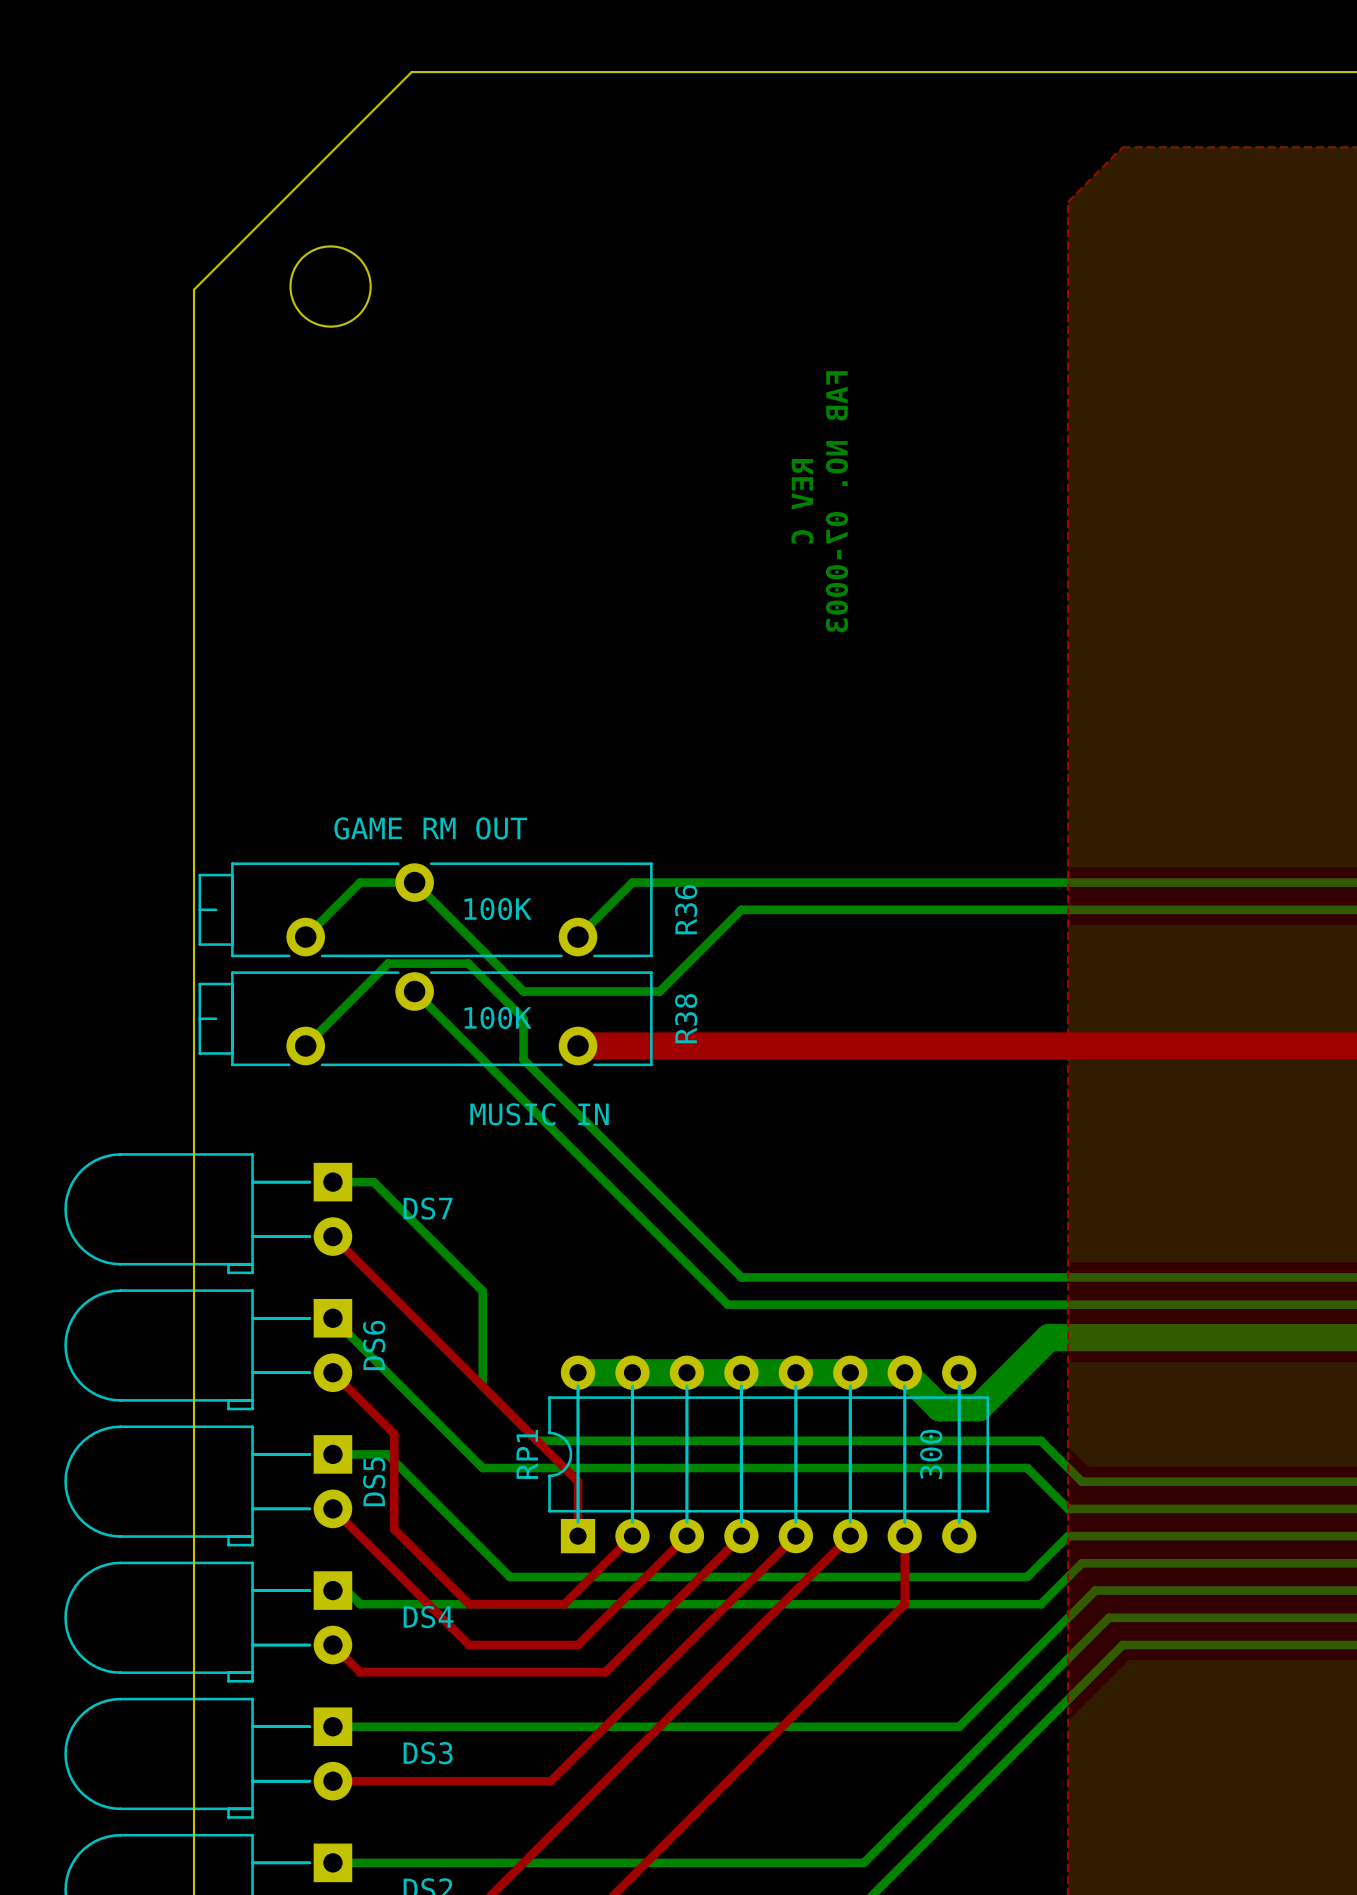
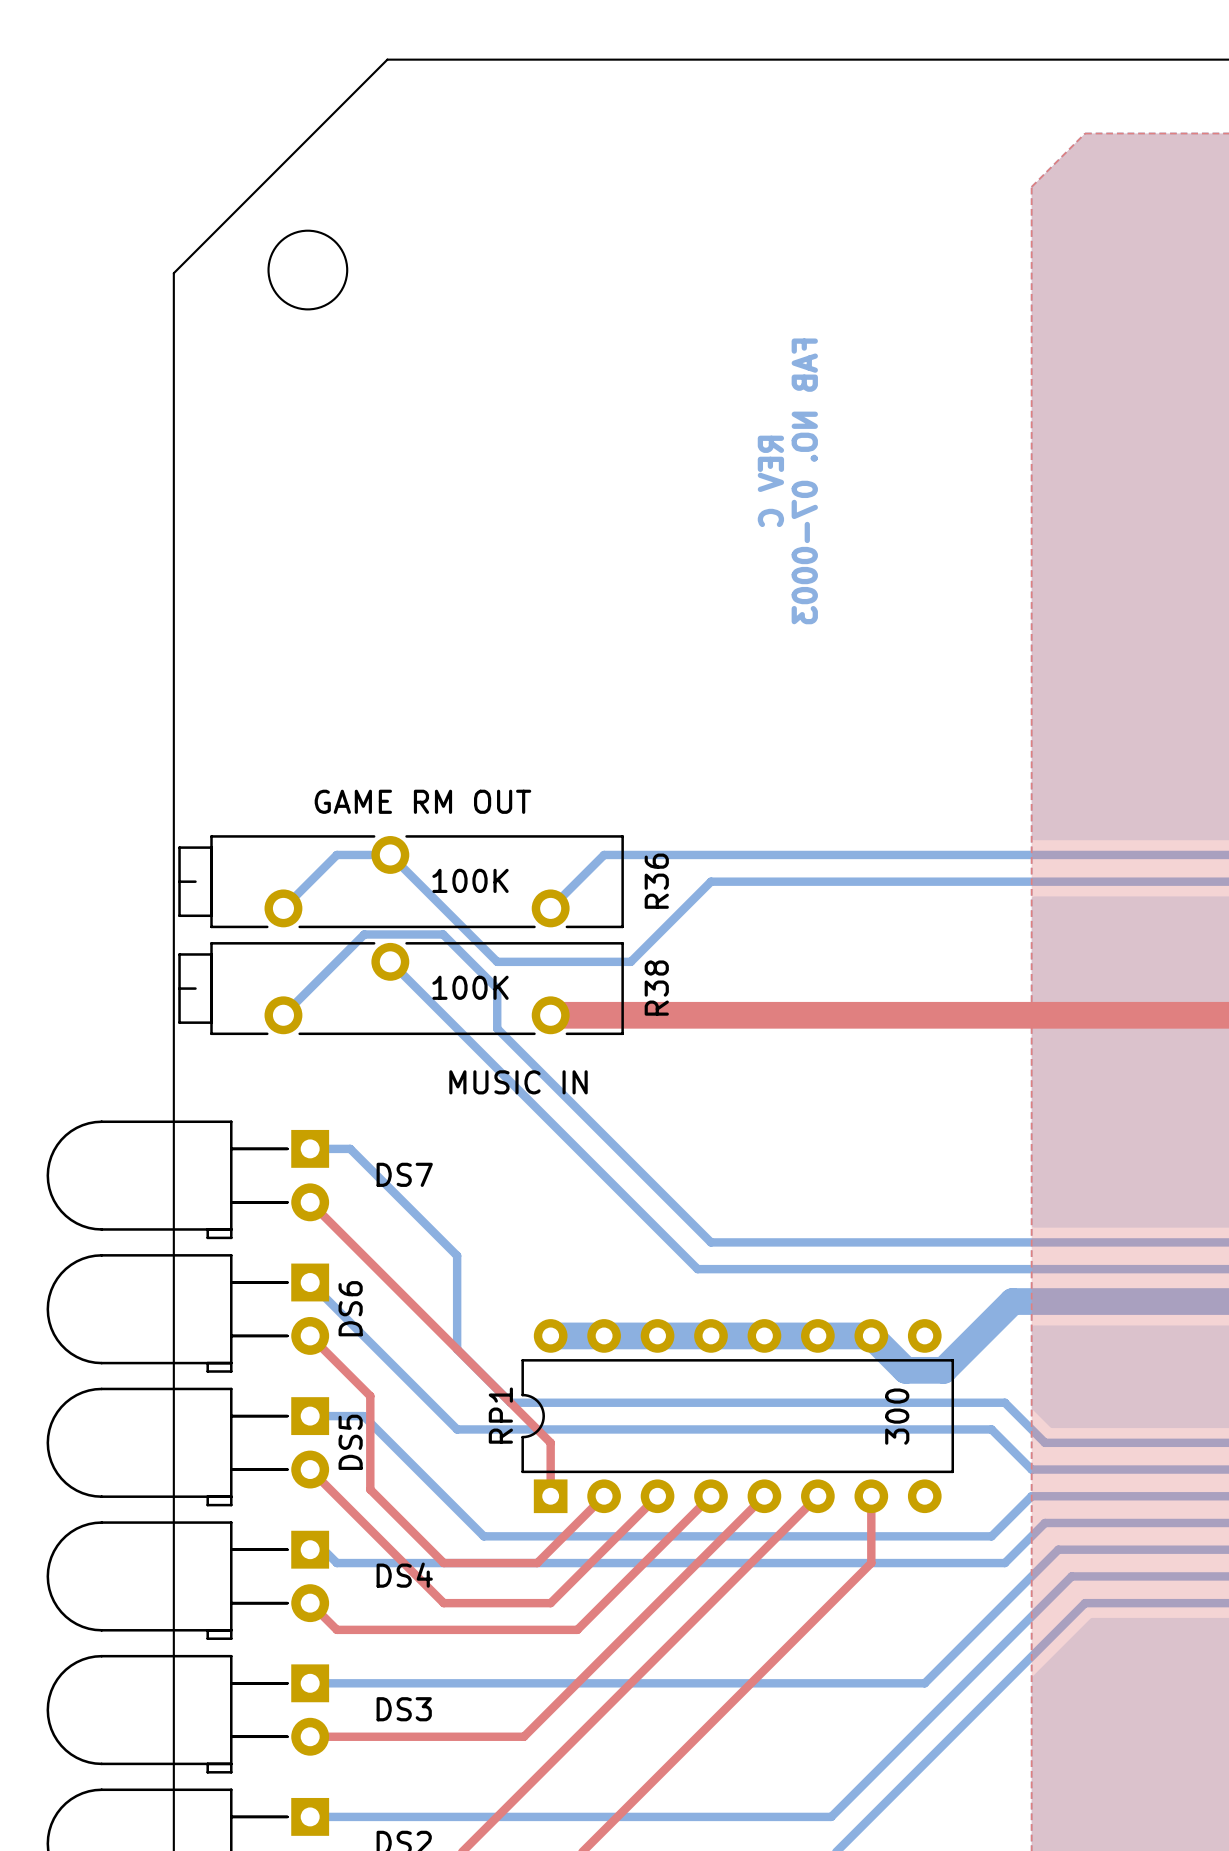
line: (578, 1386) (578, 1522) -> none
line: (632, 1386) (632, 1522) -> none
line: (686, 1386) (686, 1522) -> none
line: (741, 1386) (741, 1522) -> none
line: (795, 1386) (795, 1522) -> none
line: (850, 1386) (850, 1522) -> none
line: (904, 1386) (904, 1522) -> none
line: (959, 1386) (959, 1522) -> none

